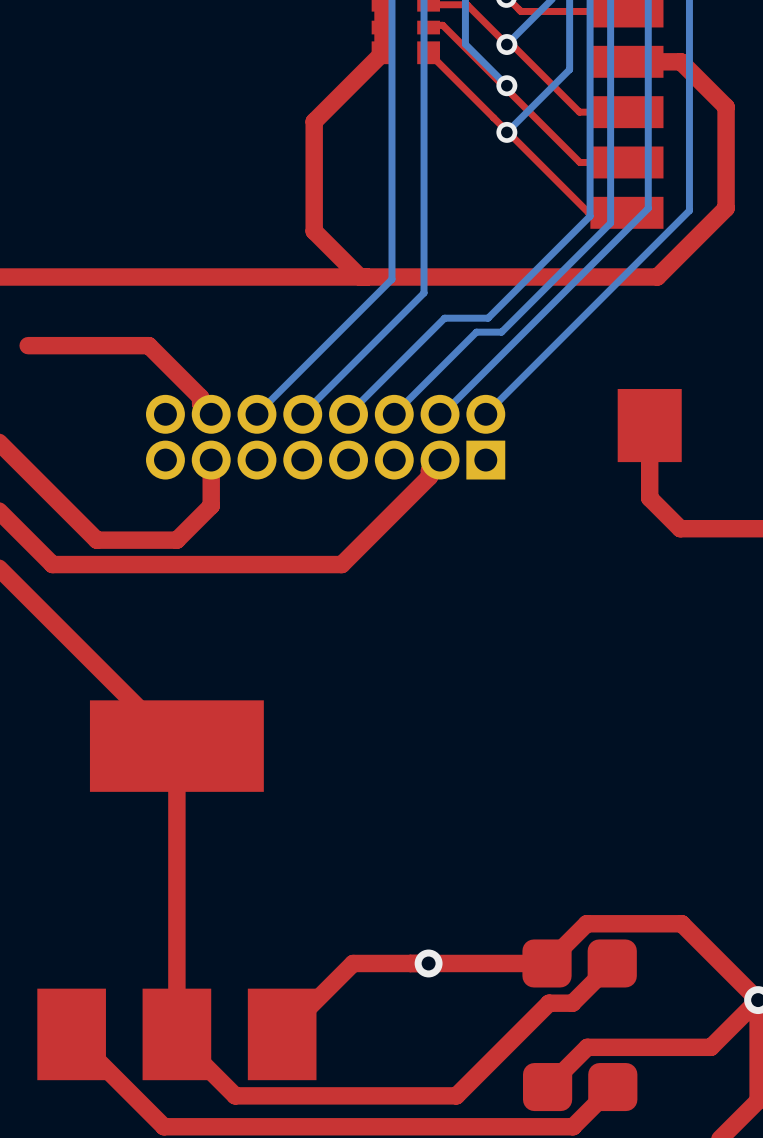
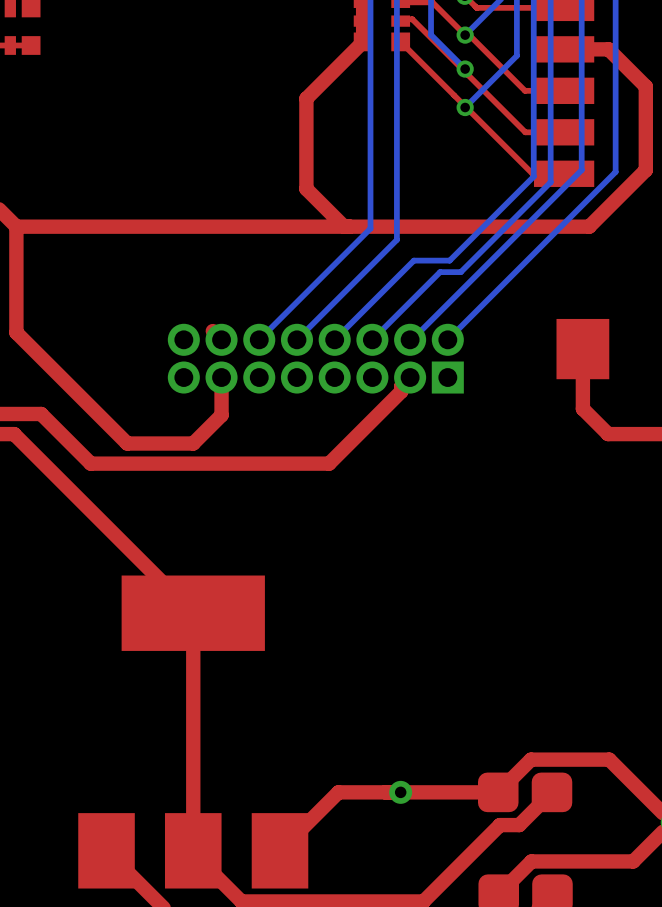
top track: (28, 345) (148, 345) (200, 397) (200, 403) -> none

